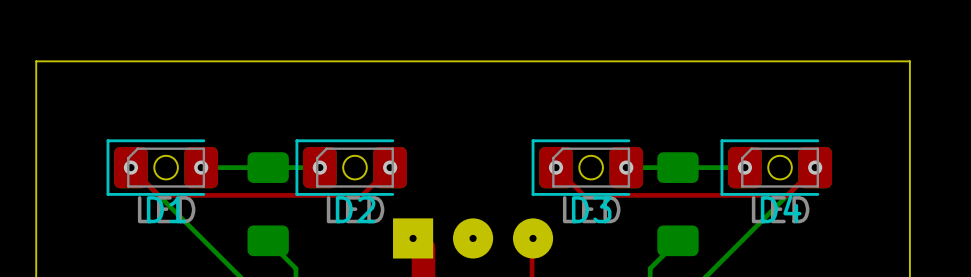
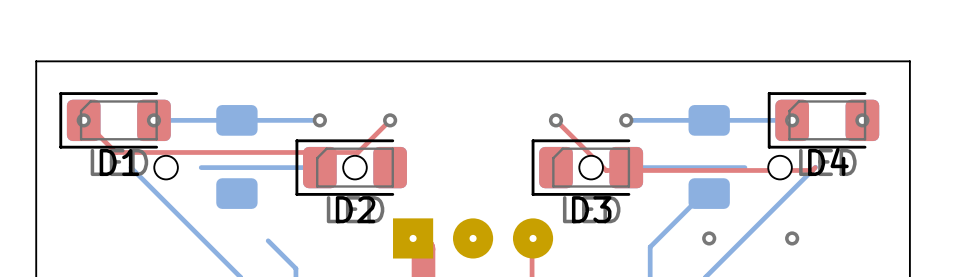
top track: none -> (83, 120) (115, 152) (358, 152) (390, 120)
via: none -> (83, 120)
bottom track: none -> (153, 120) (319, 120)
via: none -> (153, 120)
via: none -> (319, 120)
via: none -> (390, 120)
via: none -> (556, 120)
bottom track: none -> (626, 120) (792, 120)
via: none -> (626, 120)
via: none -> (792, 120)
via: none -> (862, 120)
top track: (130, 167) (158, 195) (362, 195) (390, 167) -> none
via: (130, 167) -> none
D1 position: (162, 167) -> (115, 120)
via: (201, 167) -> none
via: (319, 167) -> none
via: (390, 167) -> none
top track: (556, 167) (583, 195) (787, 195) (812, 170) -> (556, 120) (606, 170) (812, 170)
via: (556, 167) -> none
via: (626, 167) -> none
via: (744, 167) -> none
D4 position: (776, 167) -> (823, 120)
via: (815, 167) -> none
part position: (268, 204) -> (236, 156)
part position: (677, 204) -> (709, 156)
via: none -> (709, 238)
via: none -> (792, 238)
bottom track: (677, 240) (650, 268) -> (709, 193) (703, 193) (650, 247) (650, 268)

